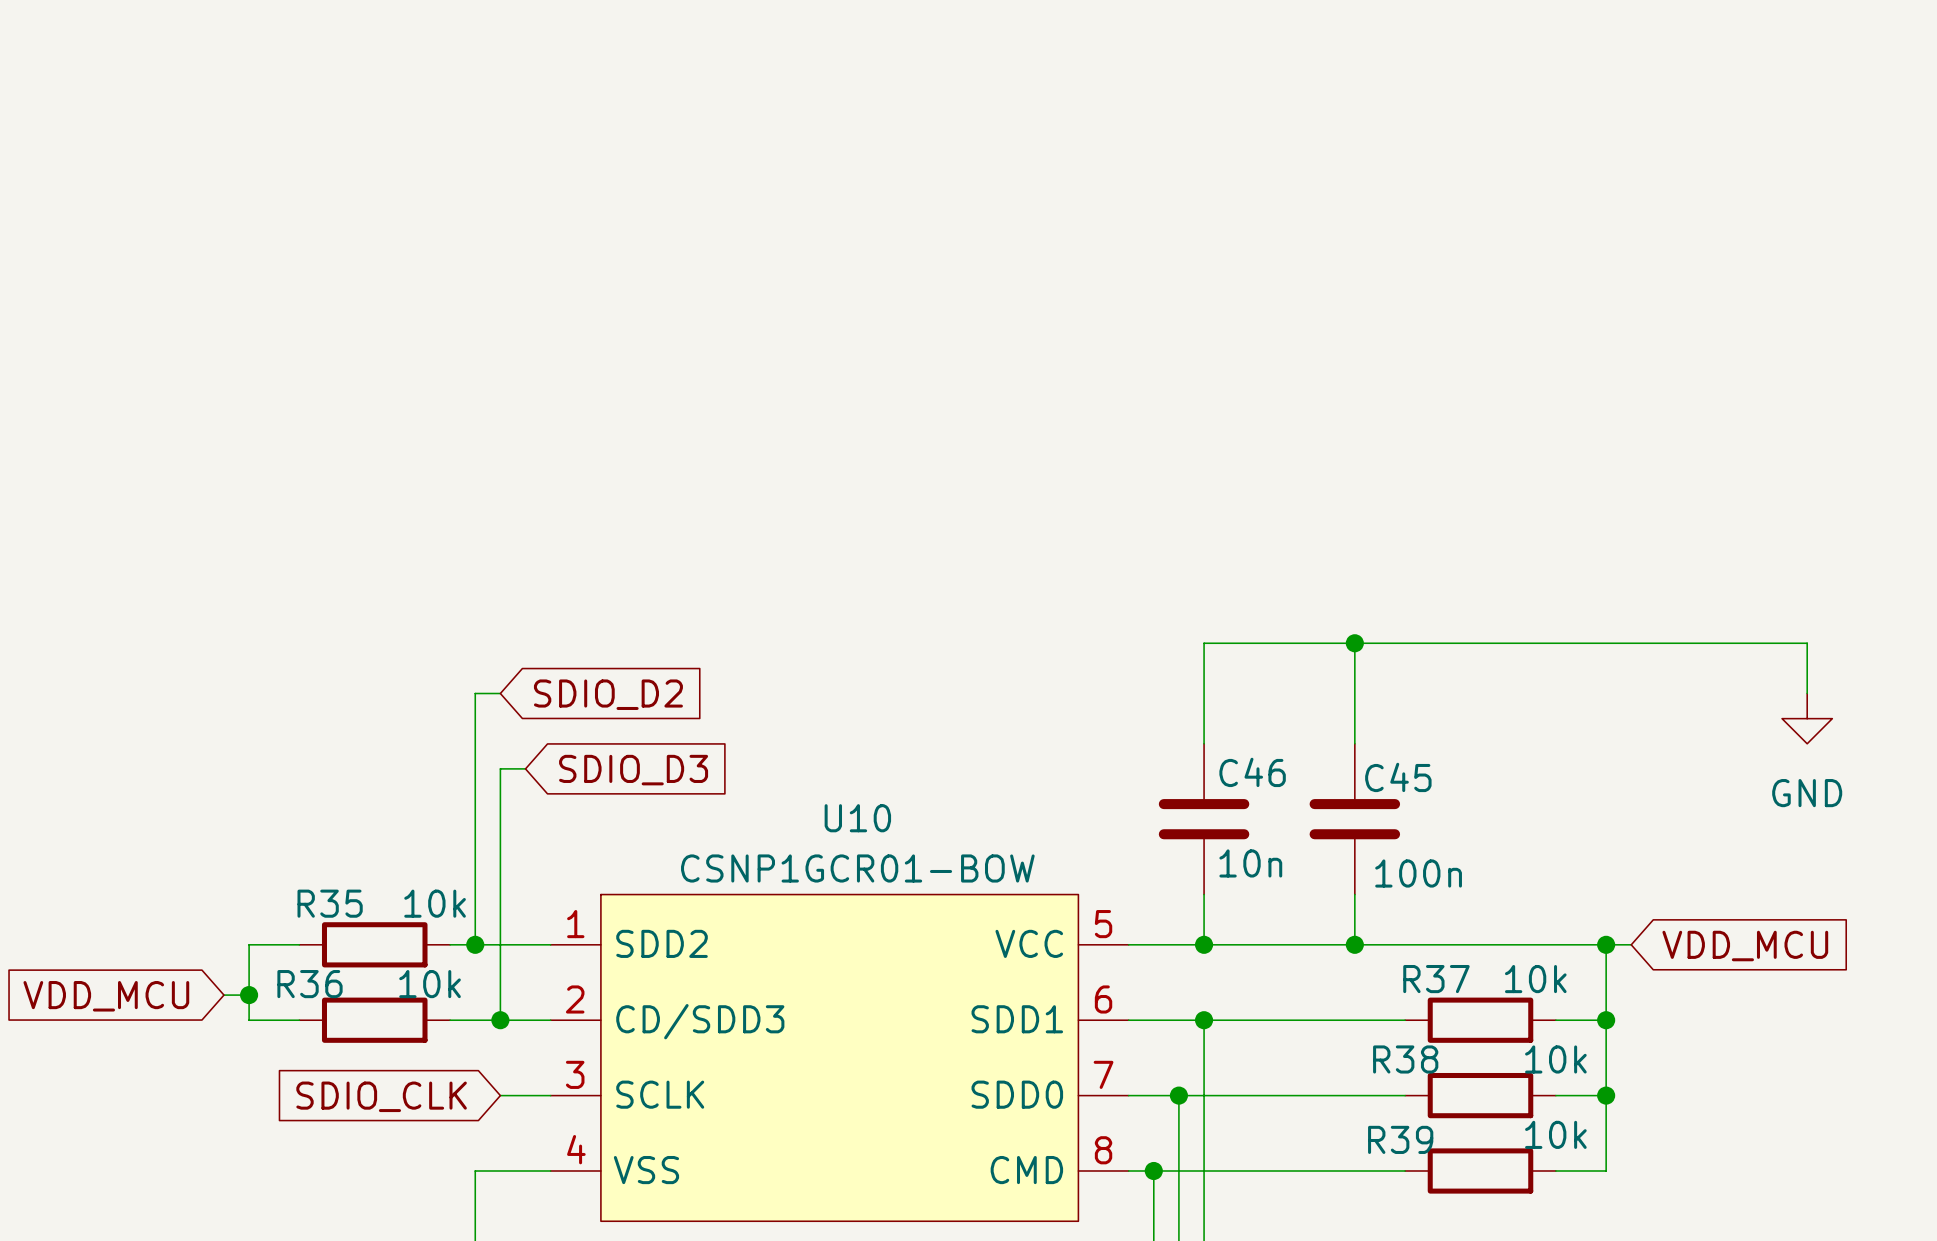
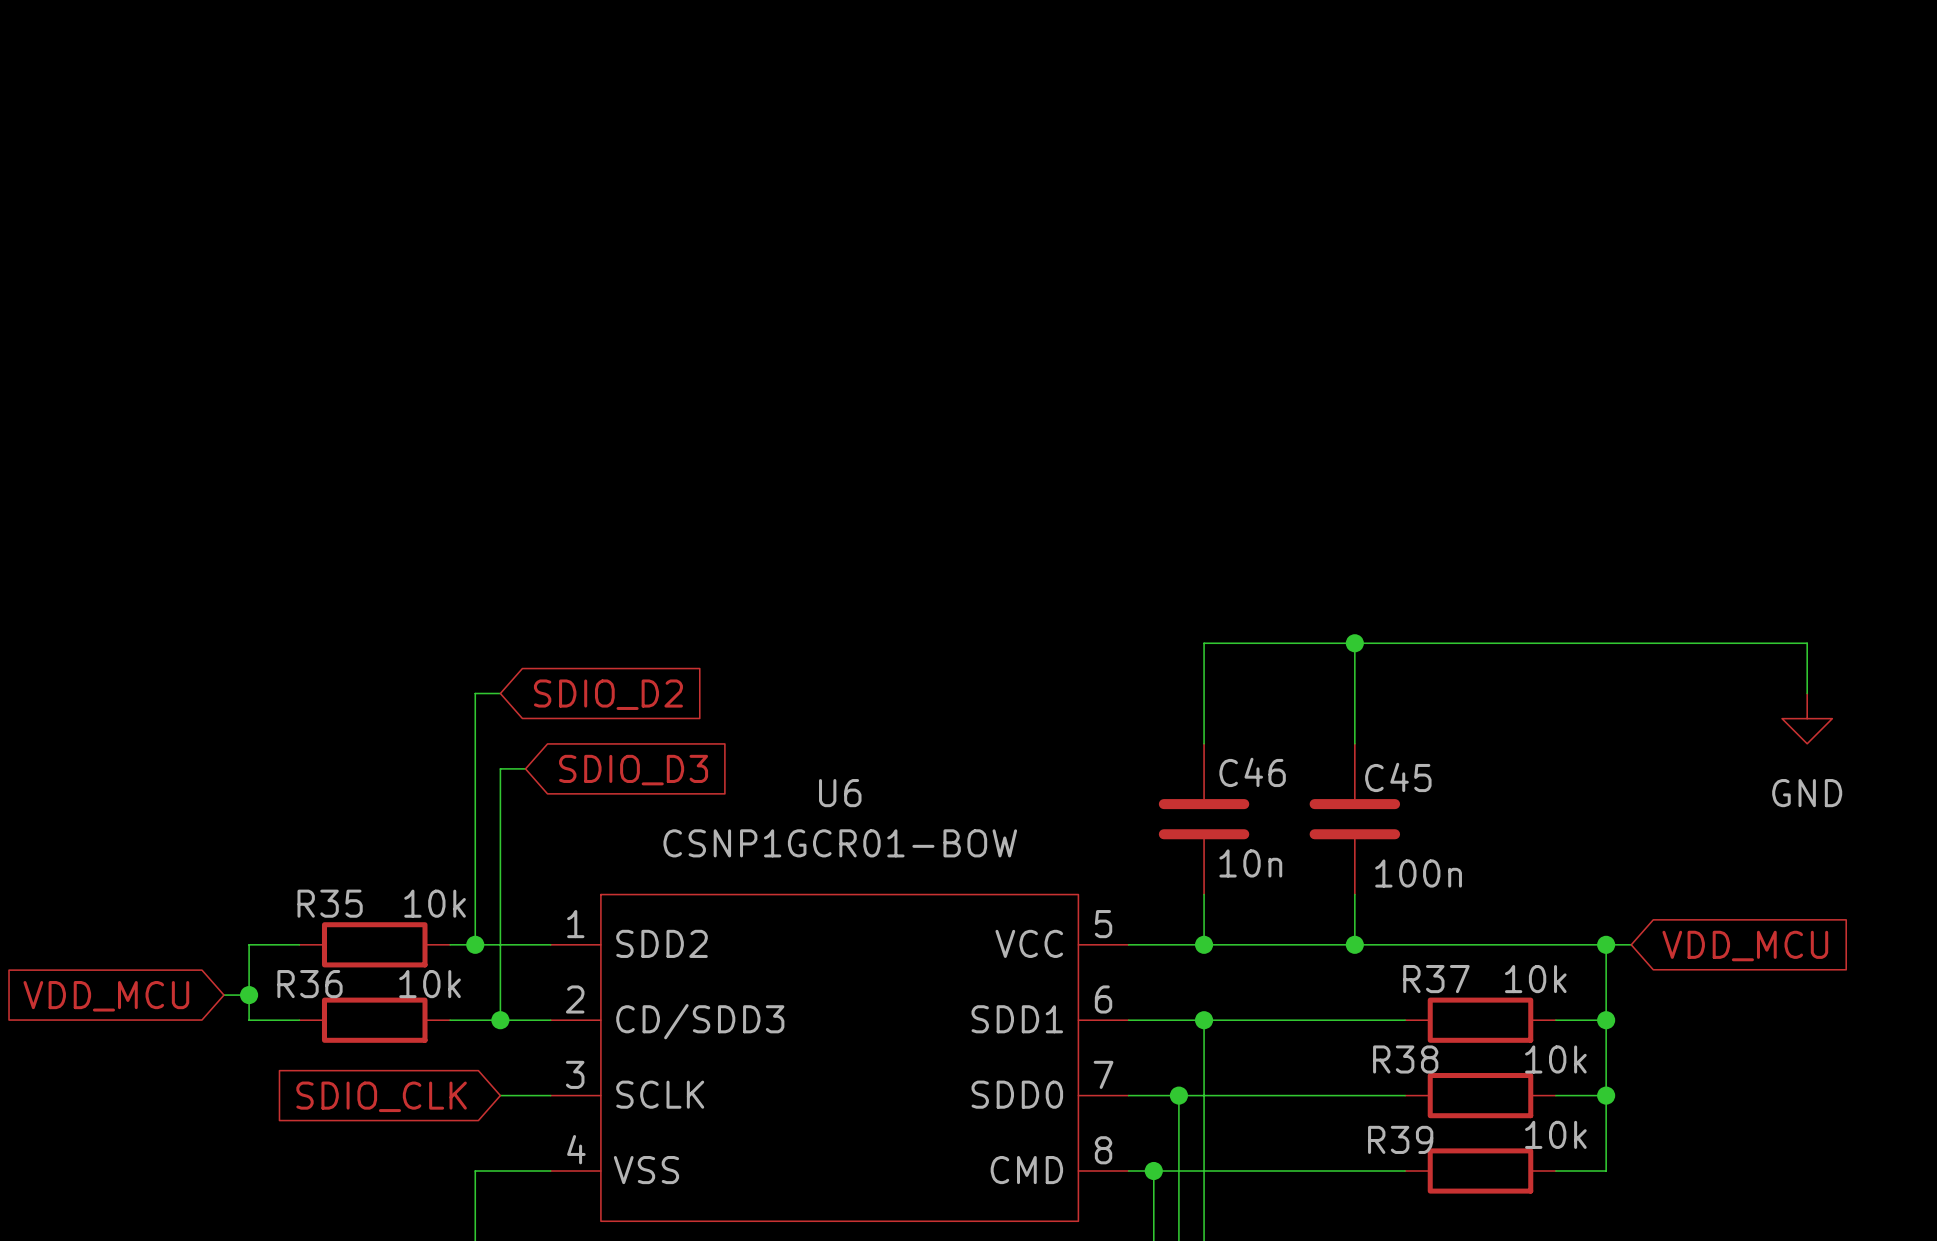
U10 name: U10 (857, 818) -> U6 (840, 793)
U10 value position: CSNP1GCR01-BOW (857, 868) -> CSNP1GCR01-BOW (840, 843)

